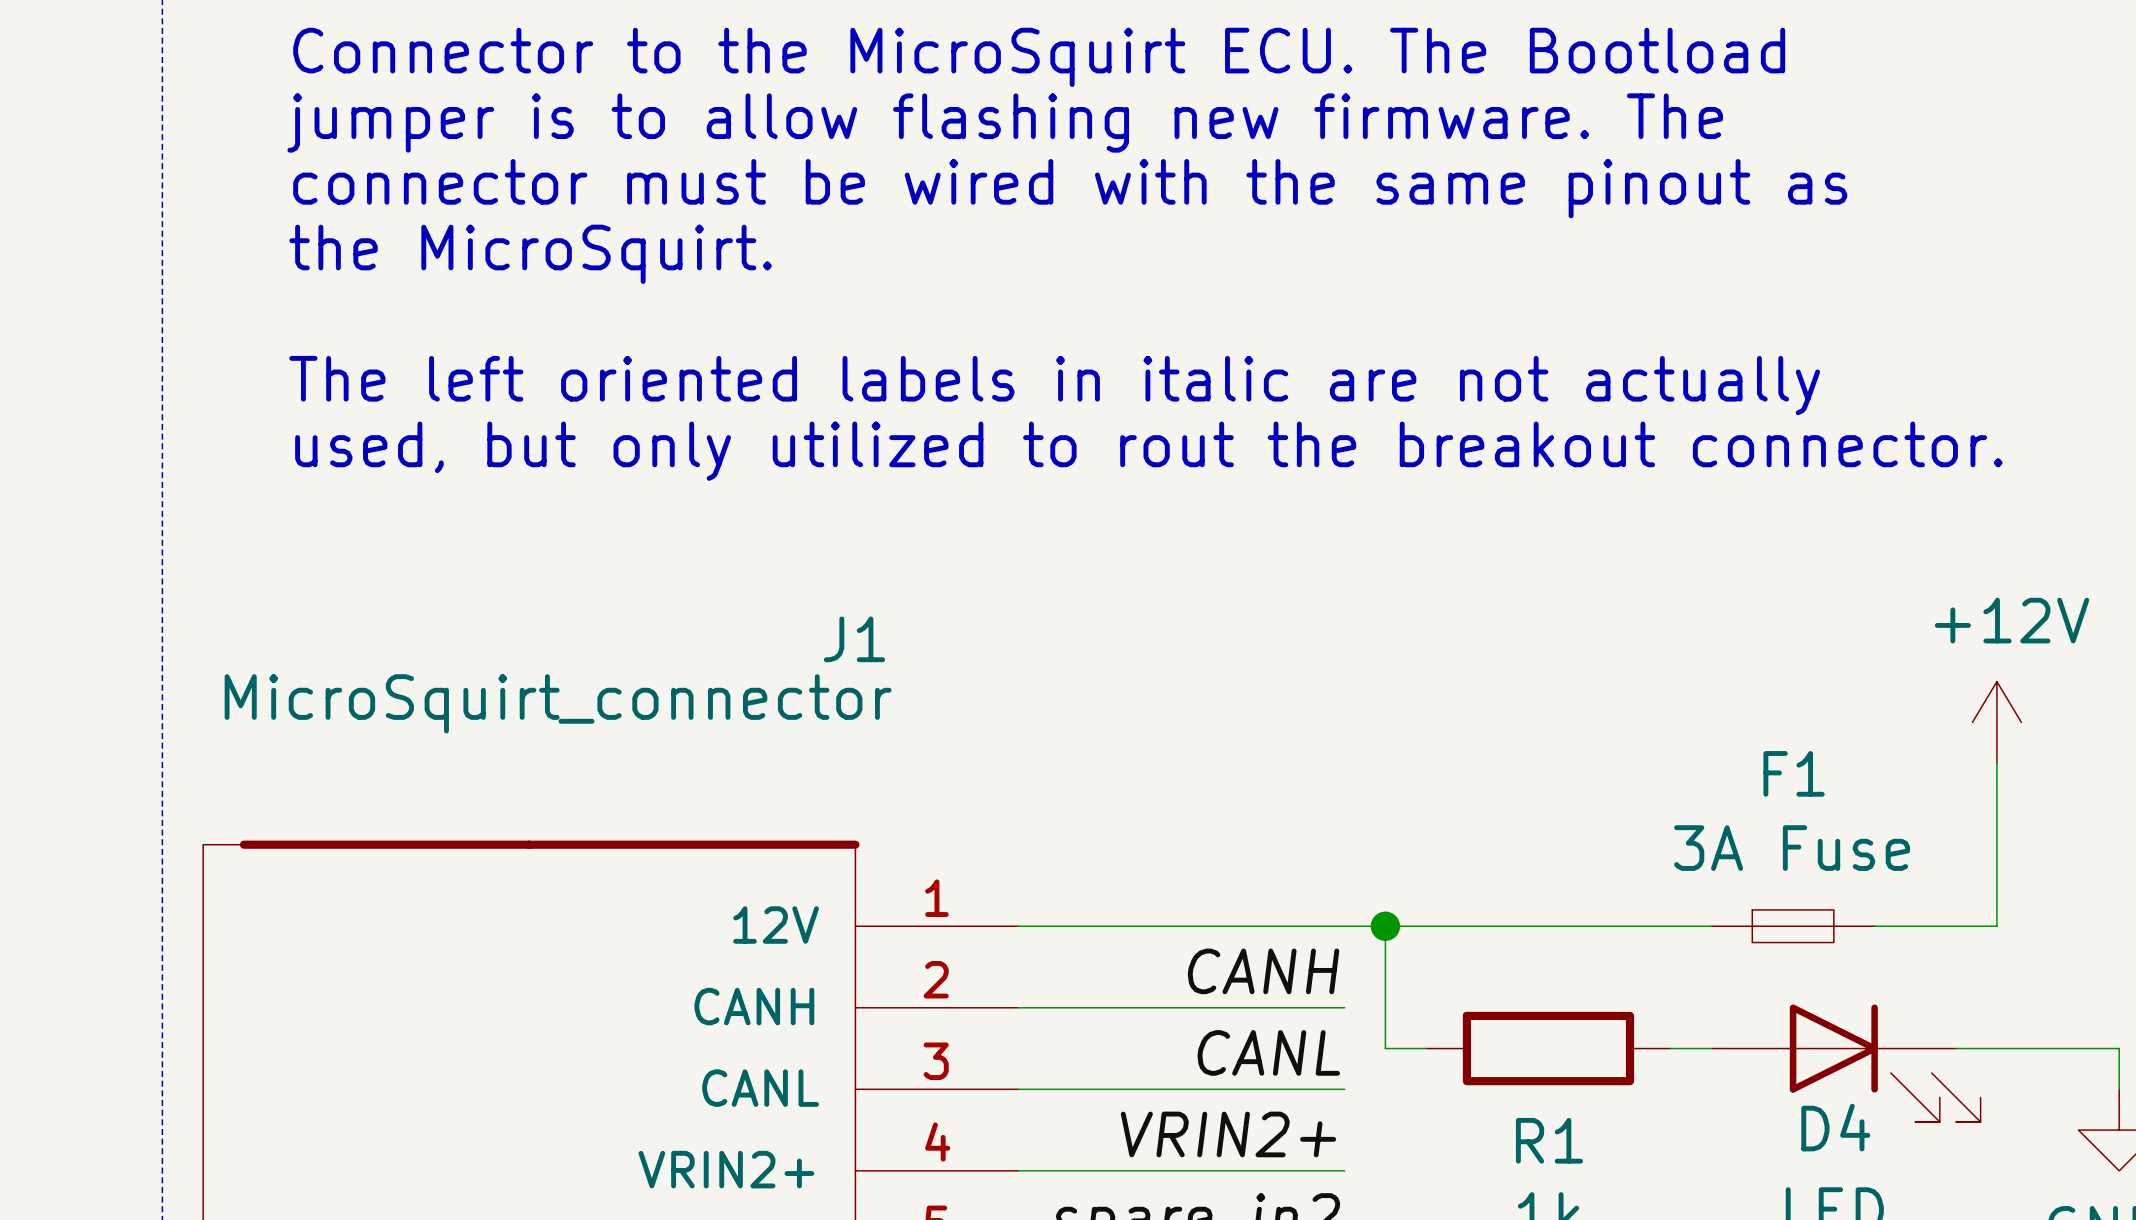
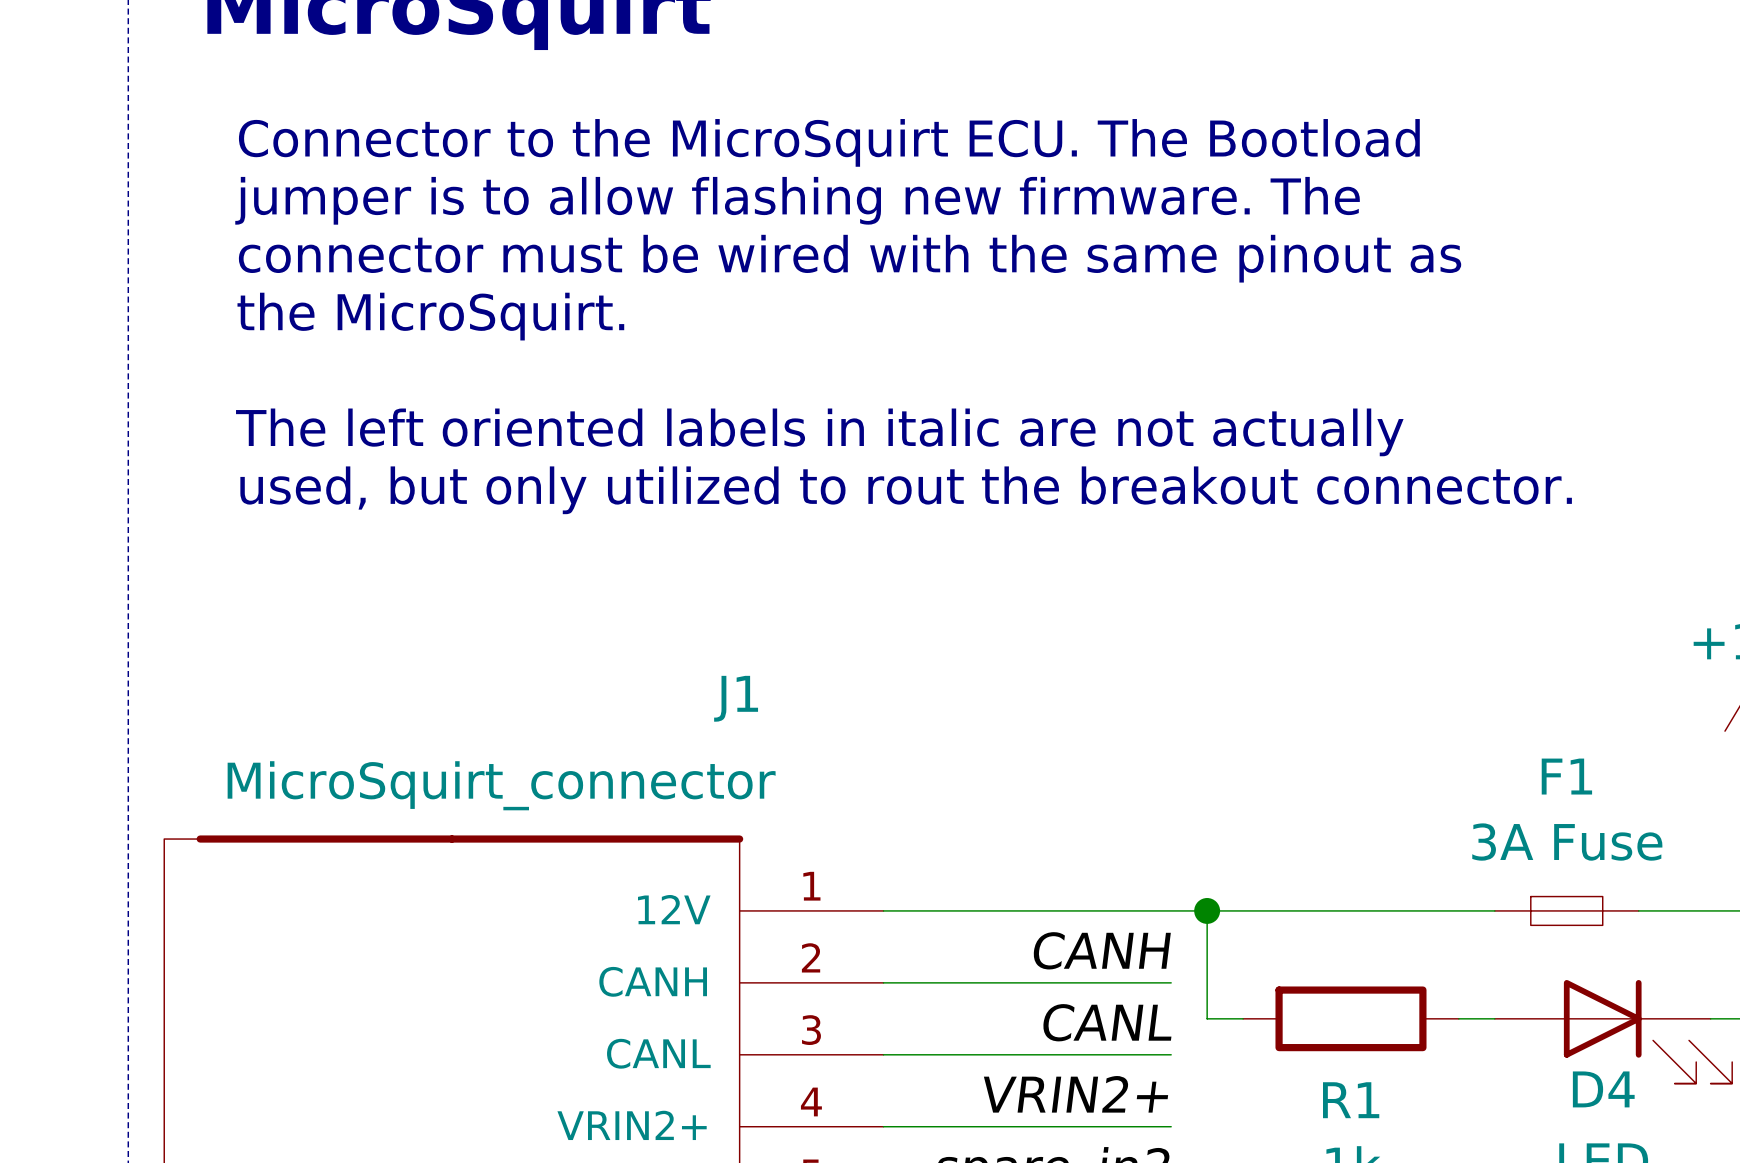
J1 name position: J1 (854, 639) -> J1 (736, 698)
J1 value position: MicroSquirt_connector (558, 703) -> MicroSquirt_connector (501, 785)

